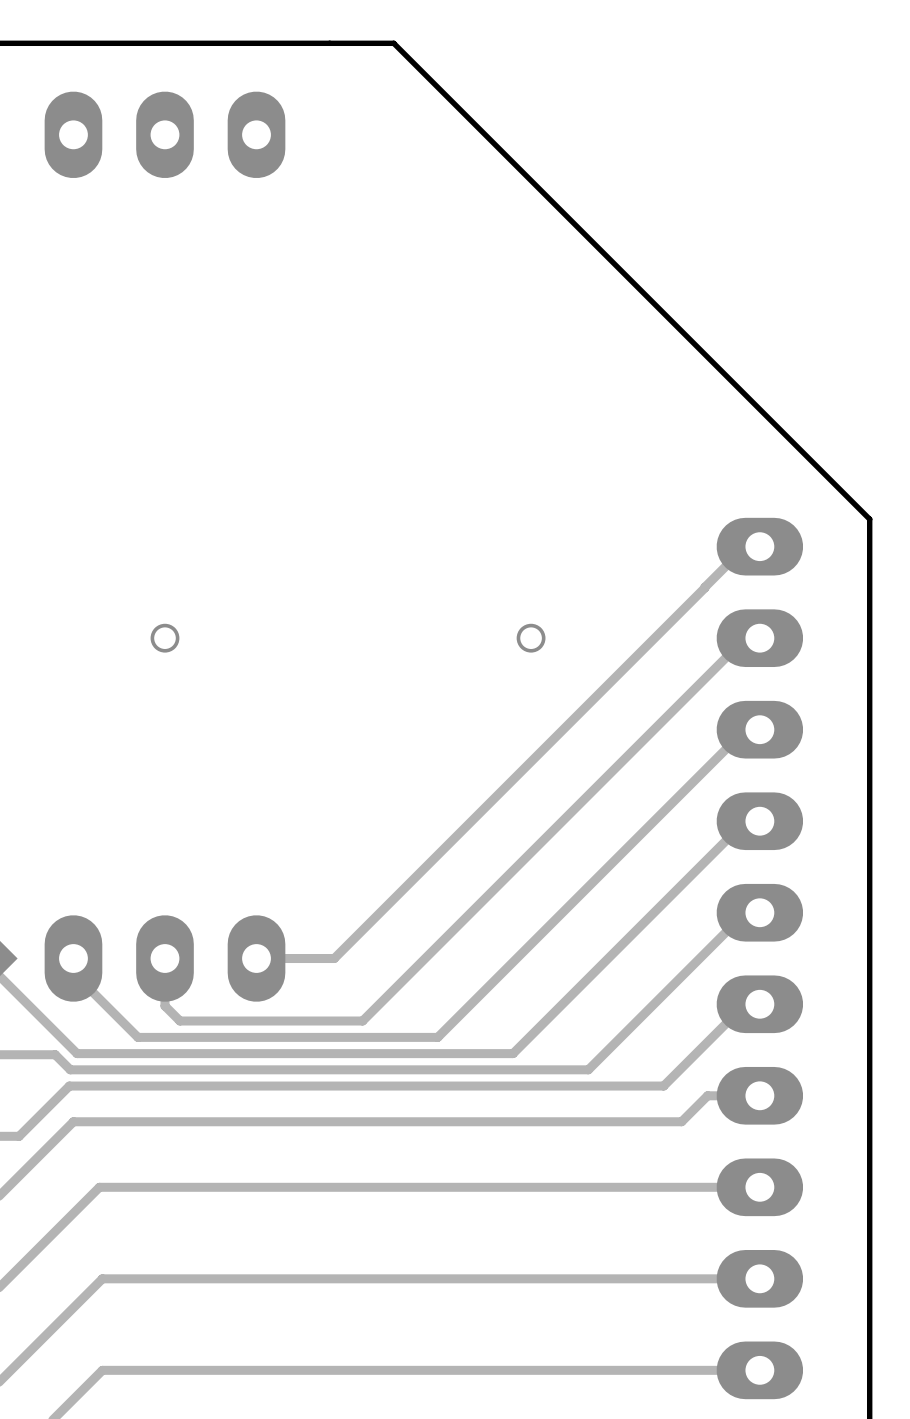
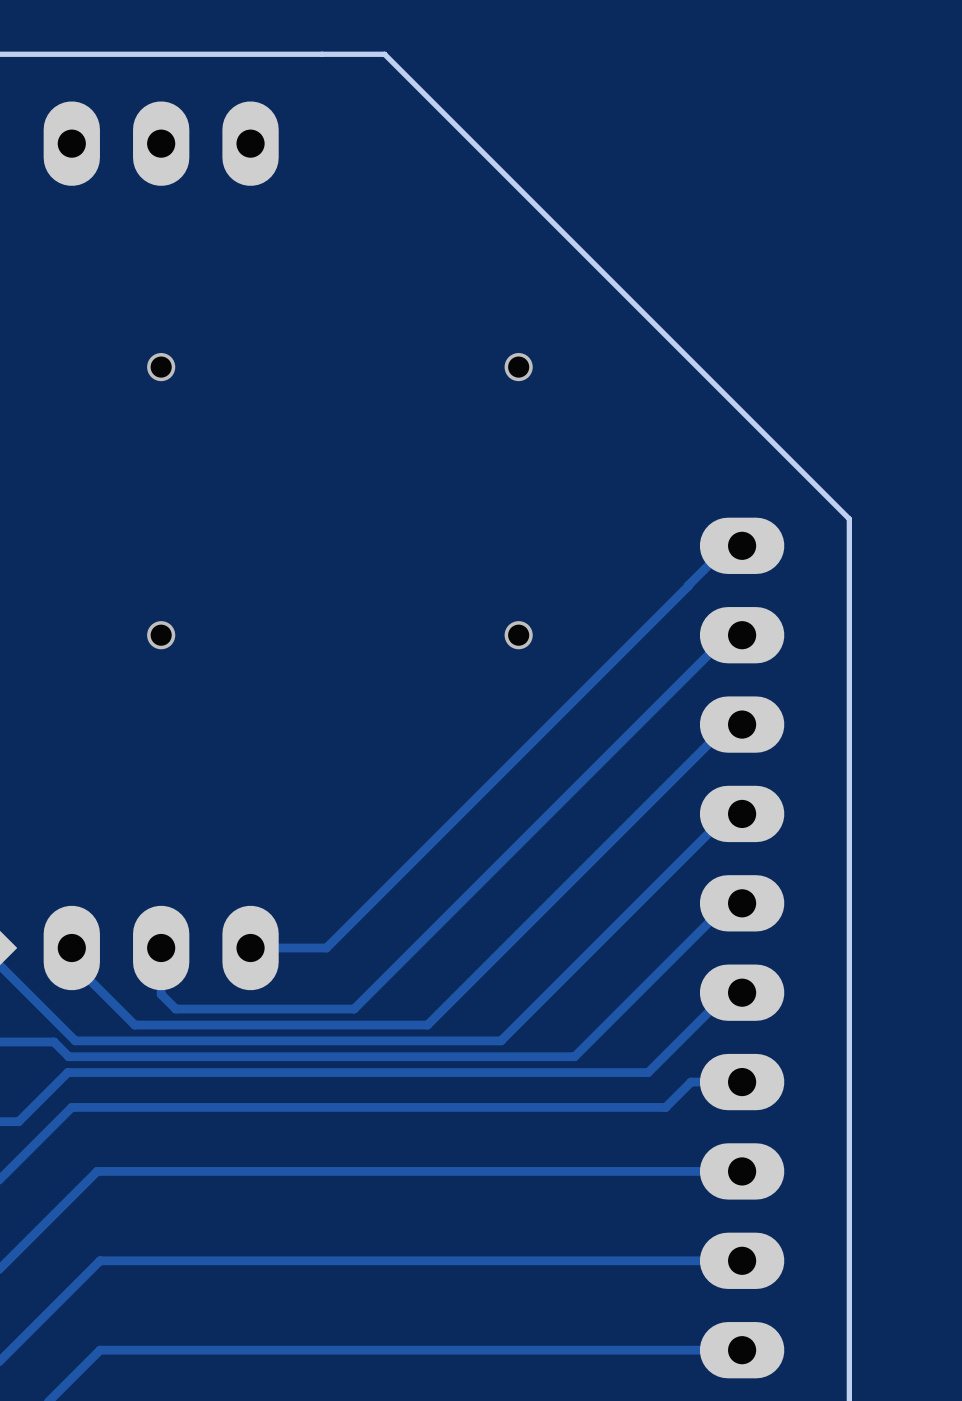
via: none -> (161, 367)
via: none -> (518, 367)

